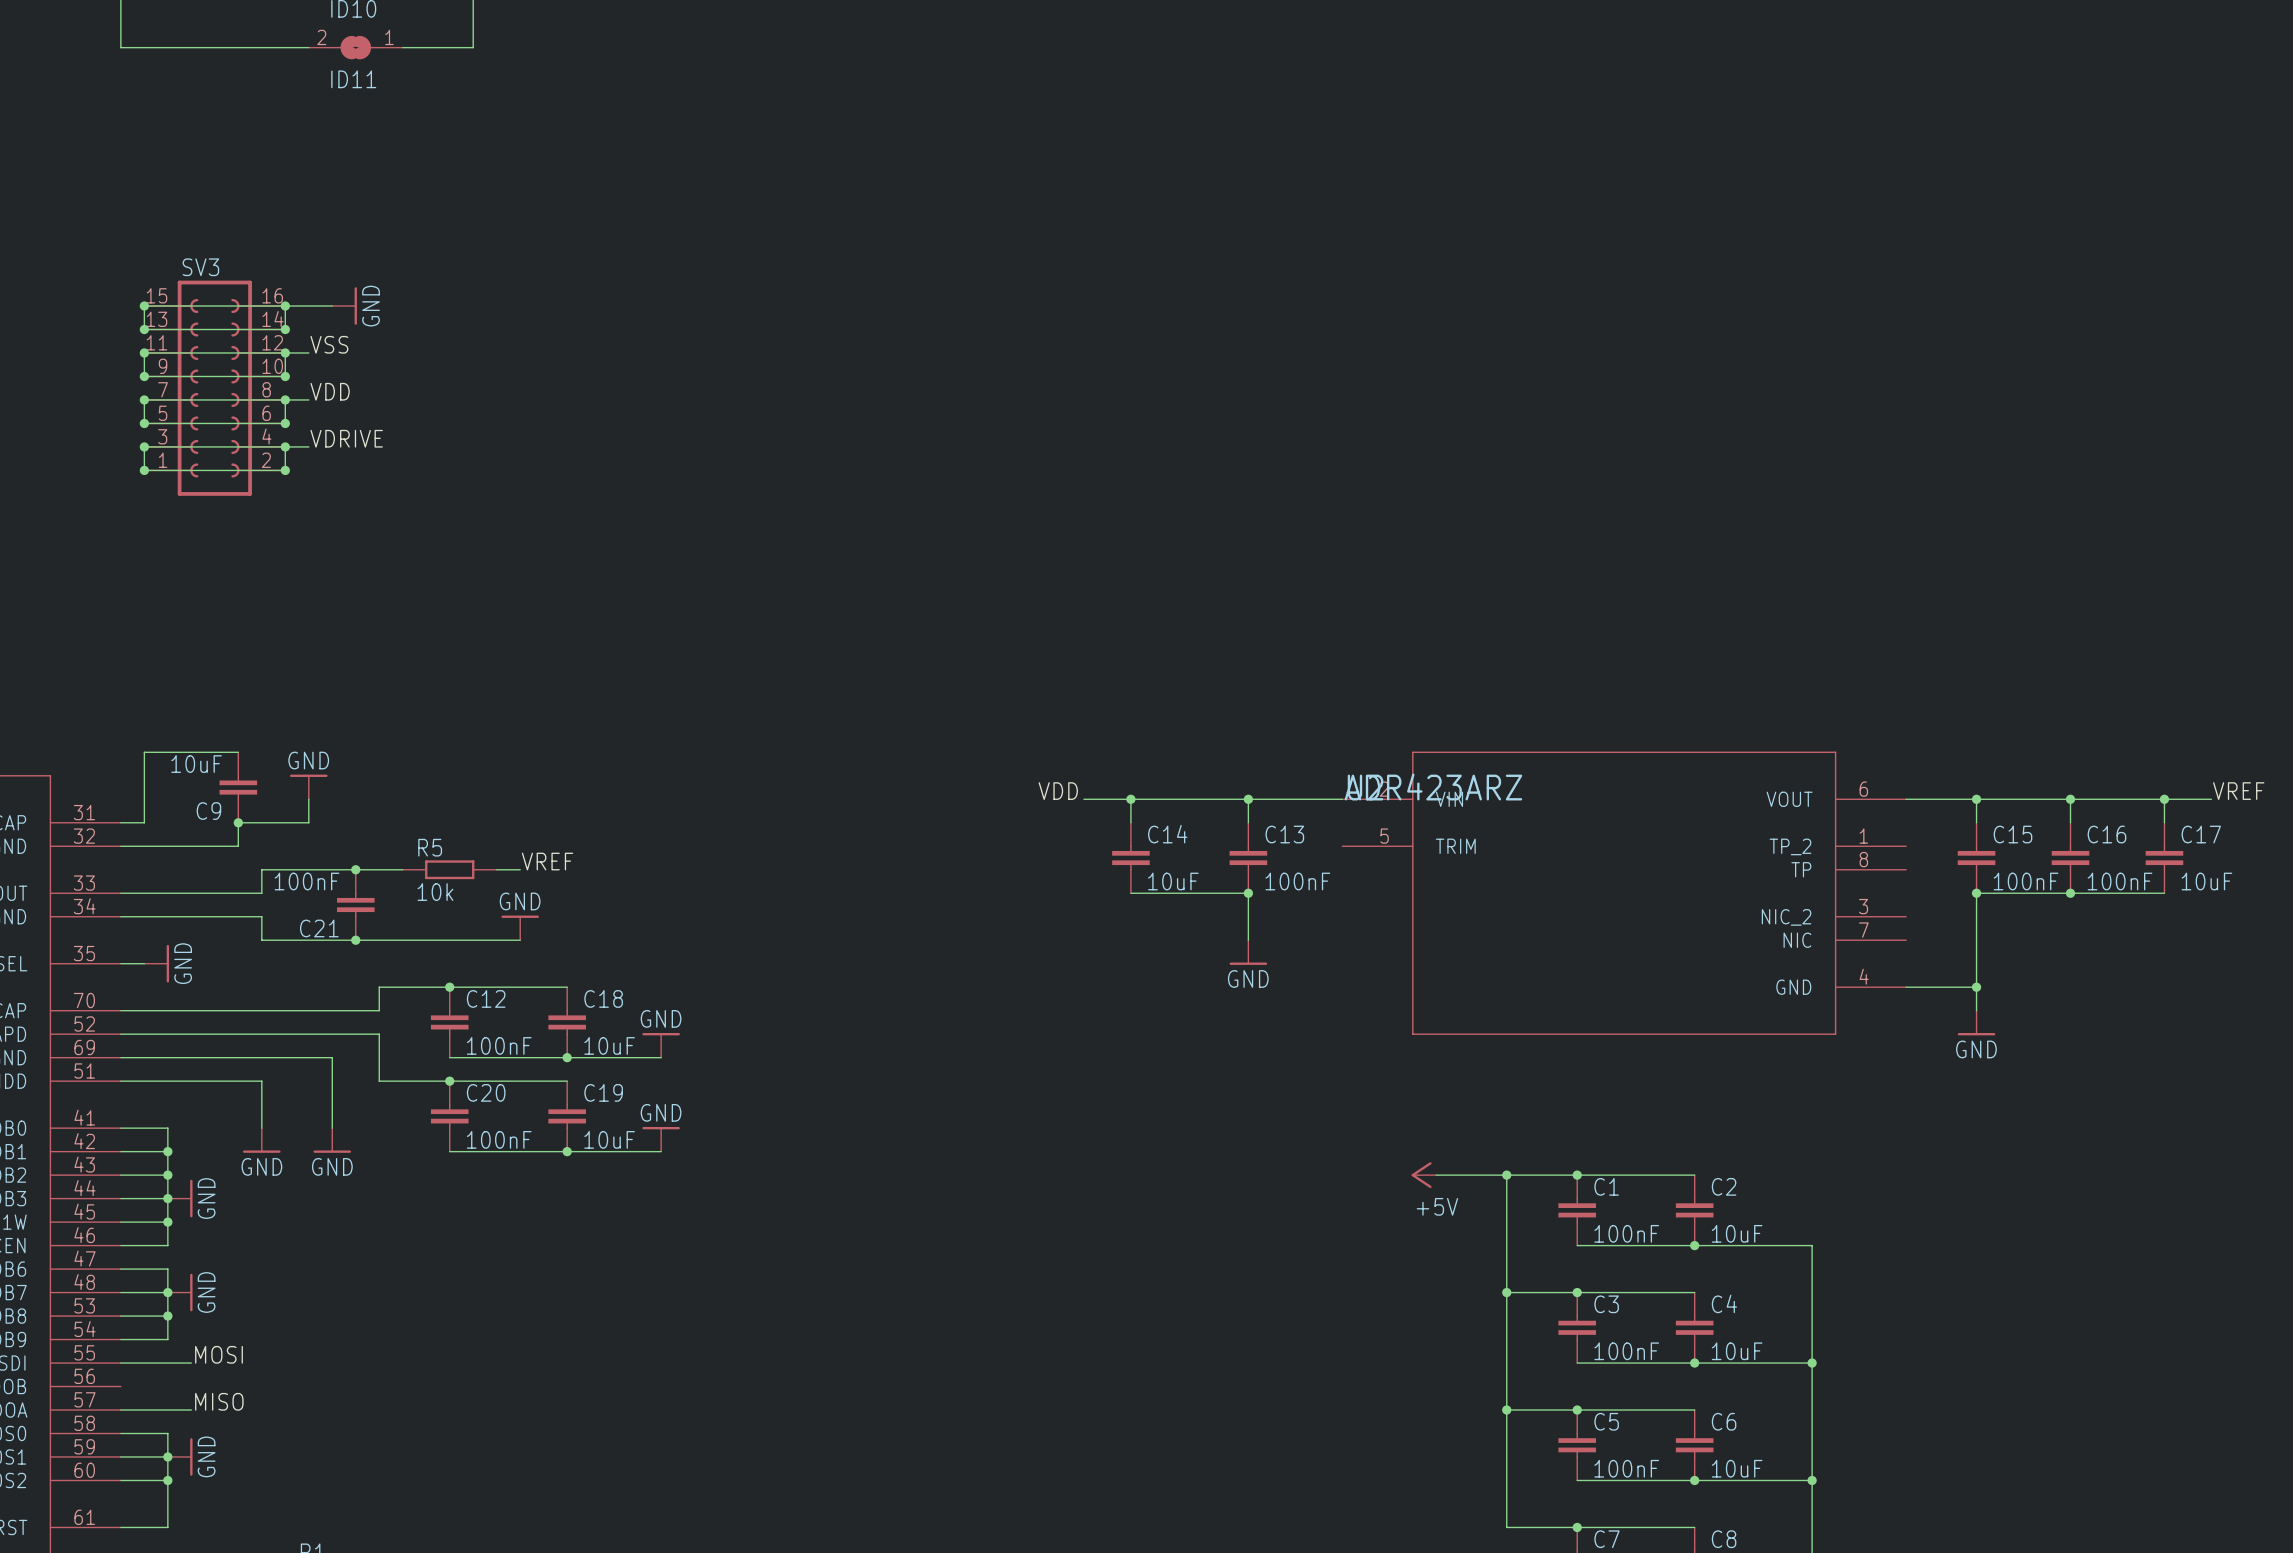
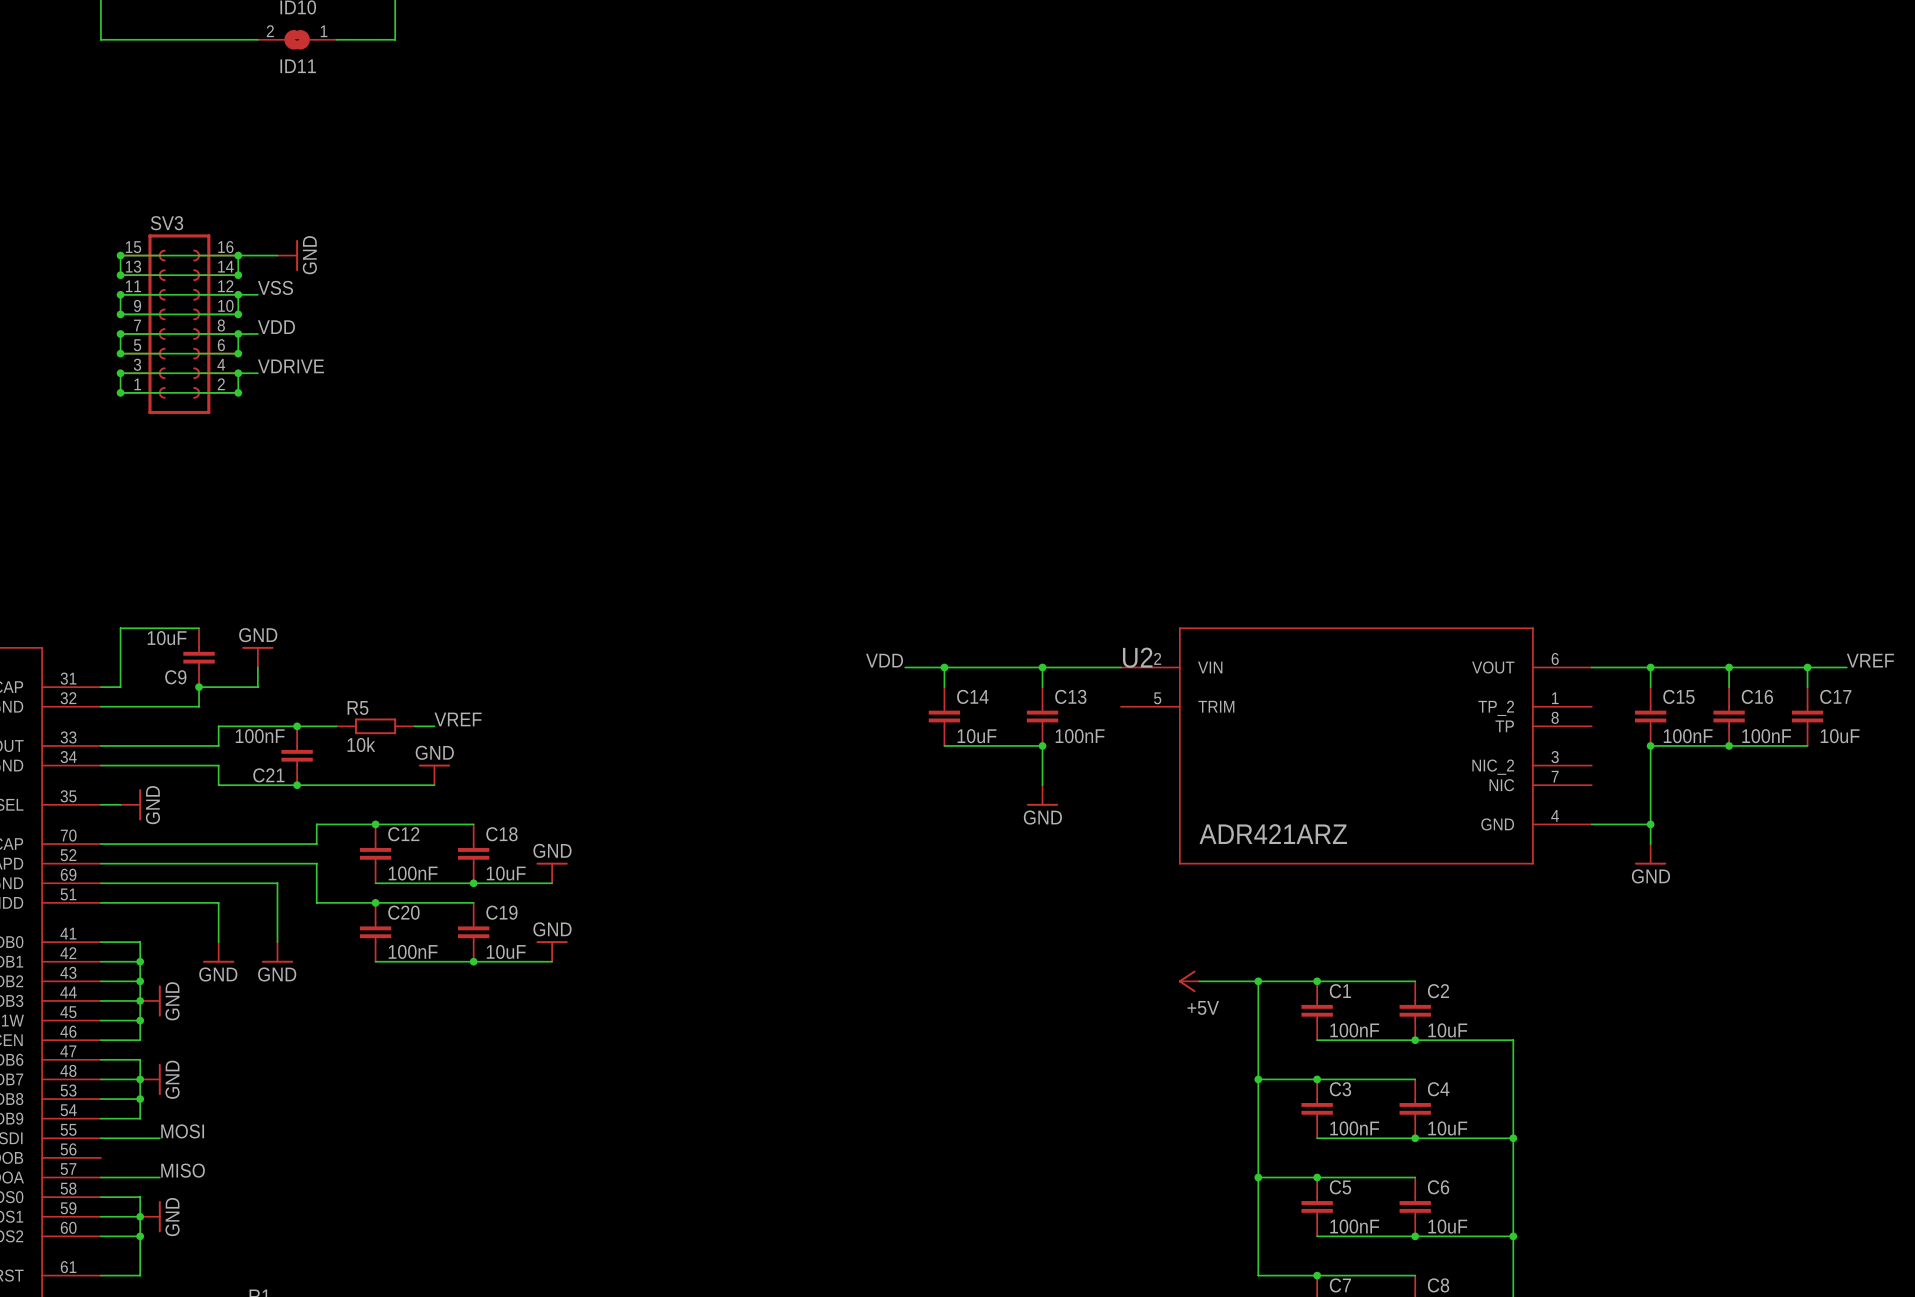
U2 value: ADR423ARZ (1433, 786) -> ADR421ARZ (1273, 834)

